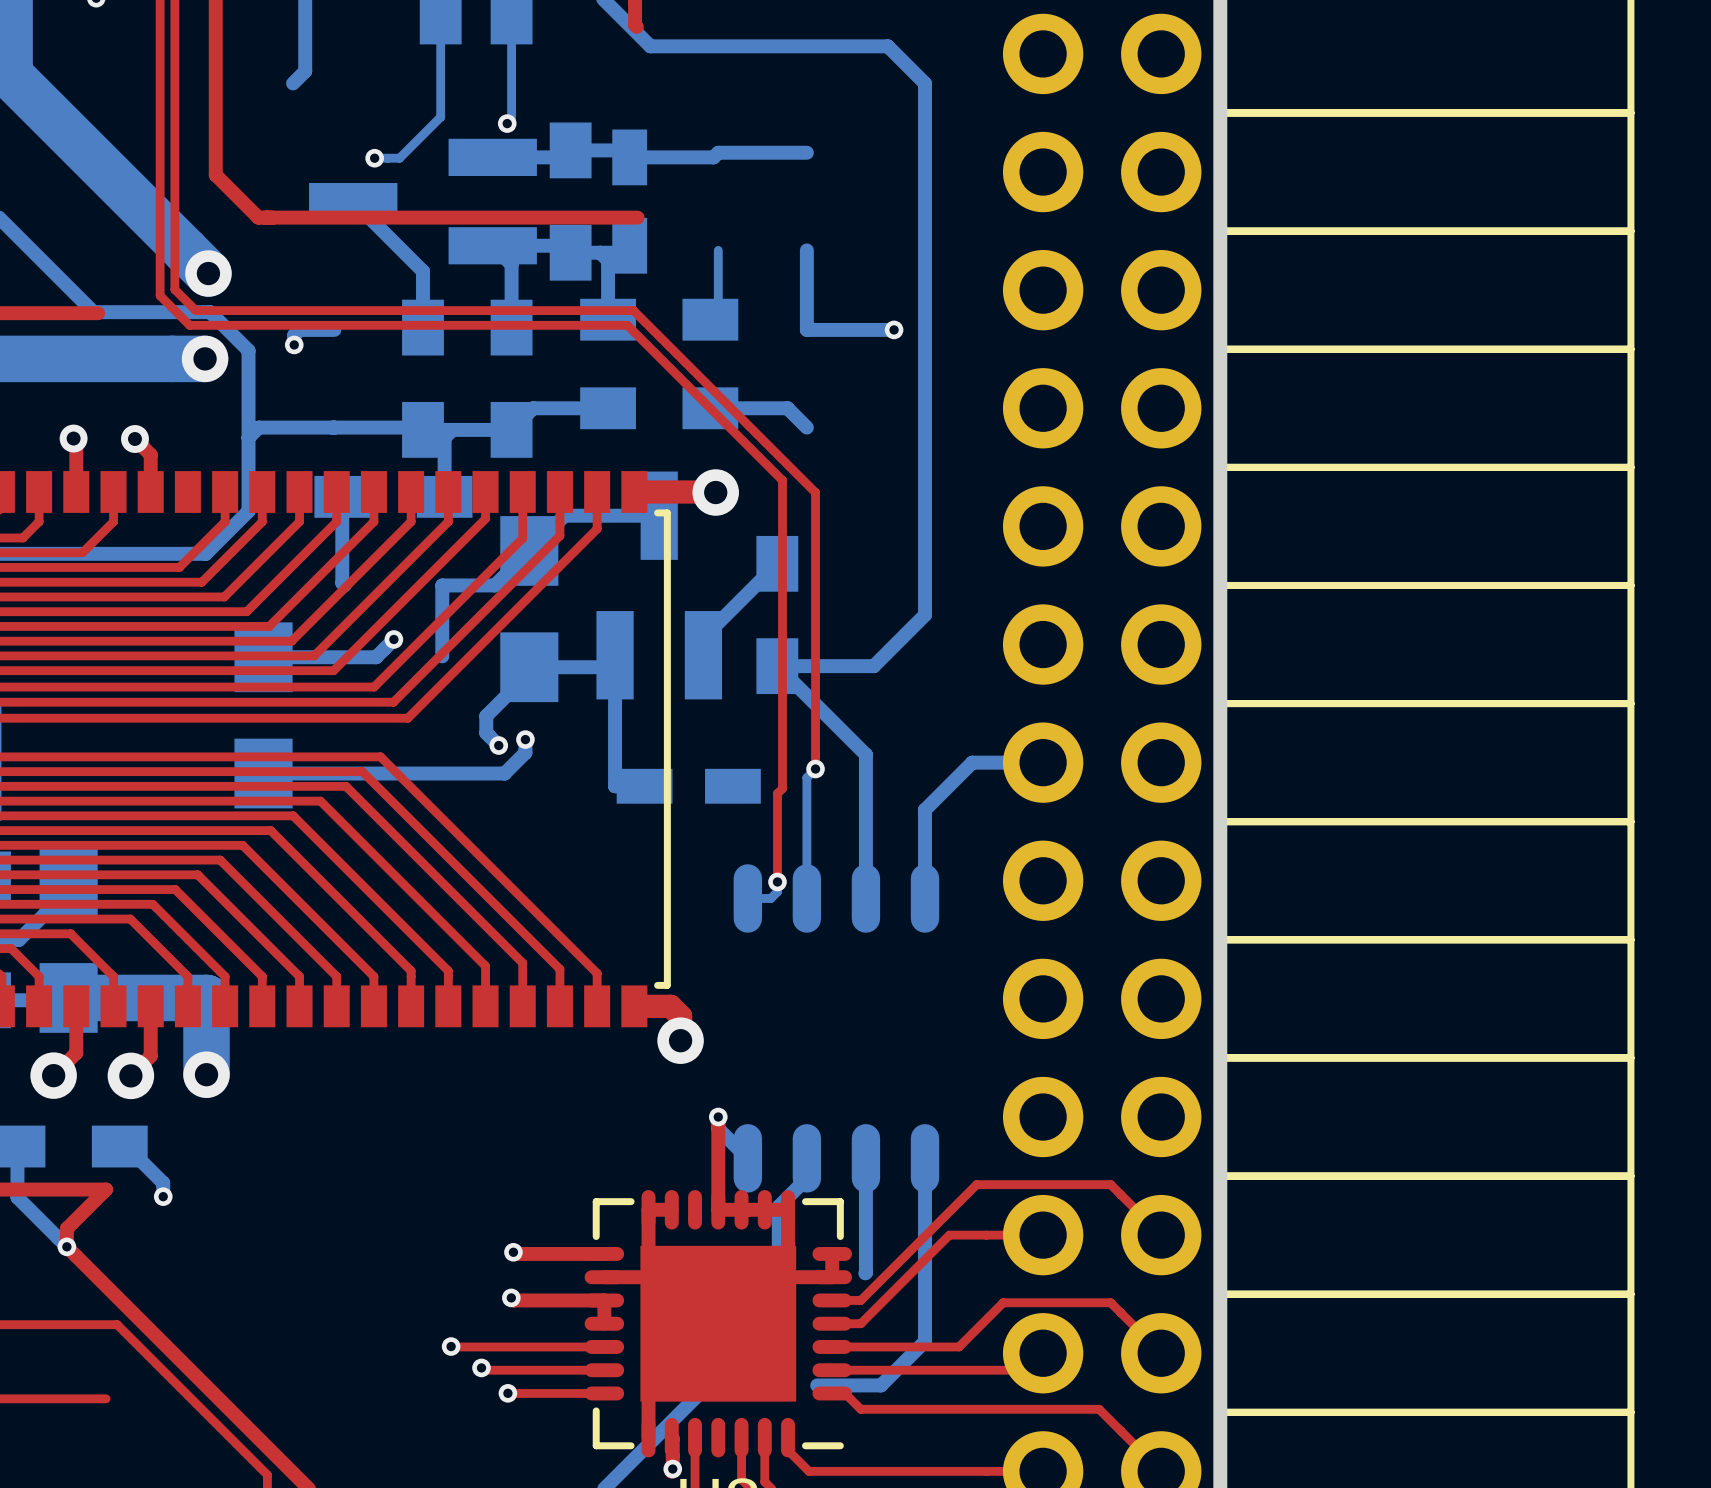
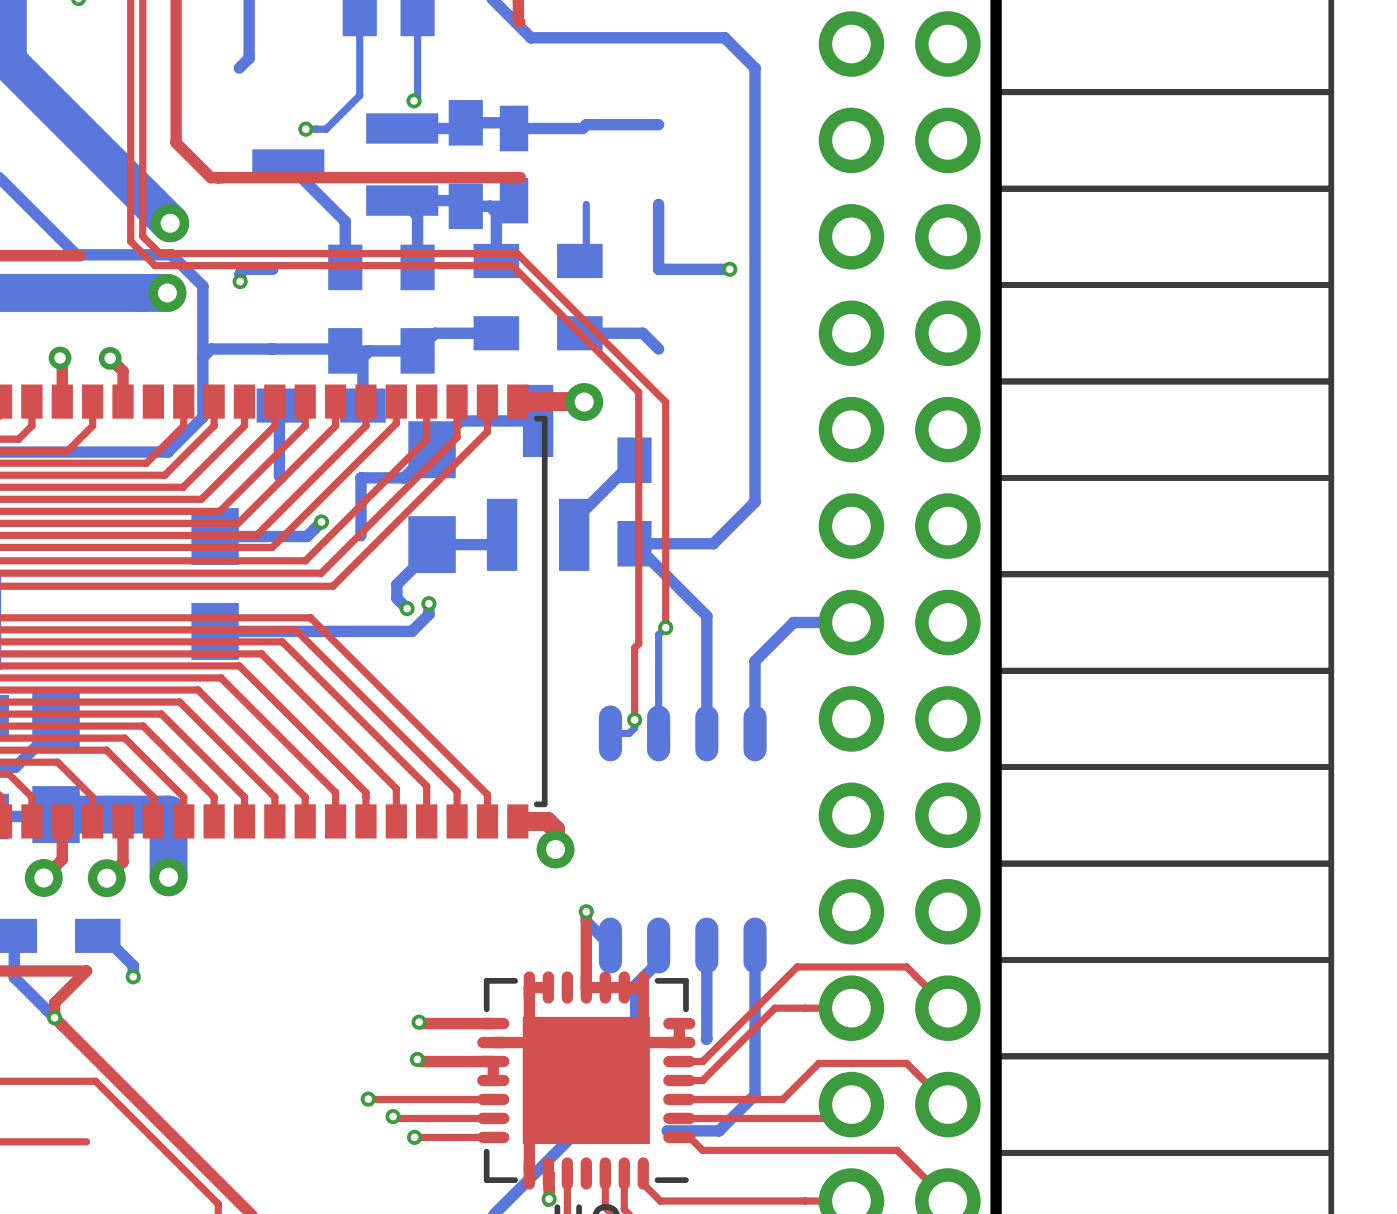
bottom track: (615, 655) (615, 786) (644, 786) -> none
part: (688, 786) -> none

